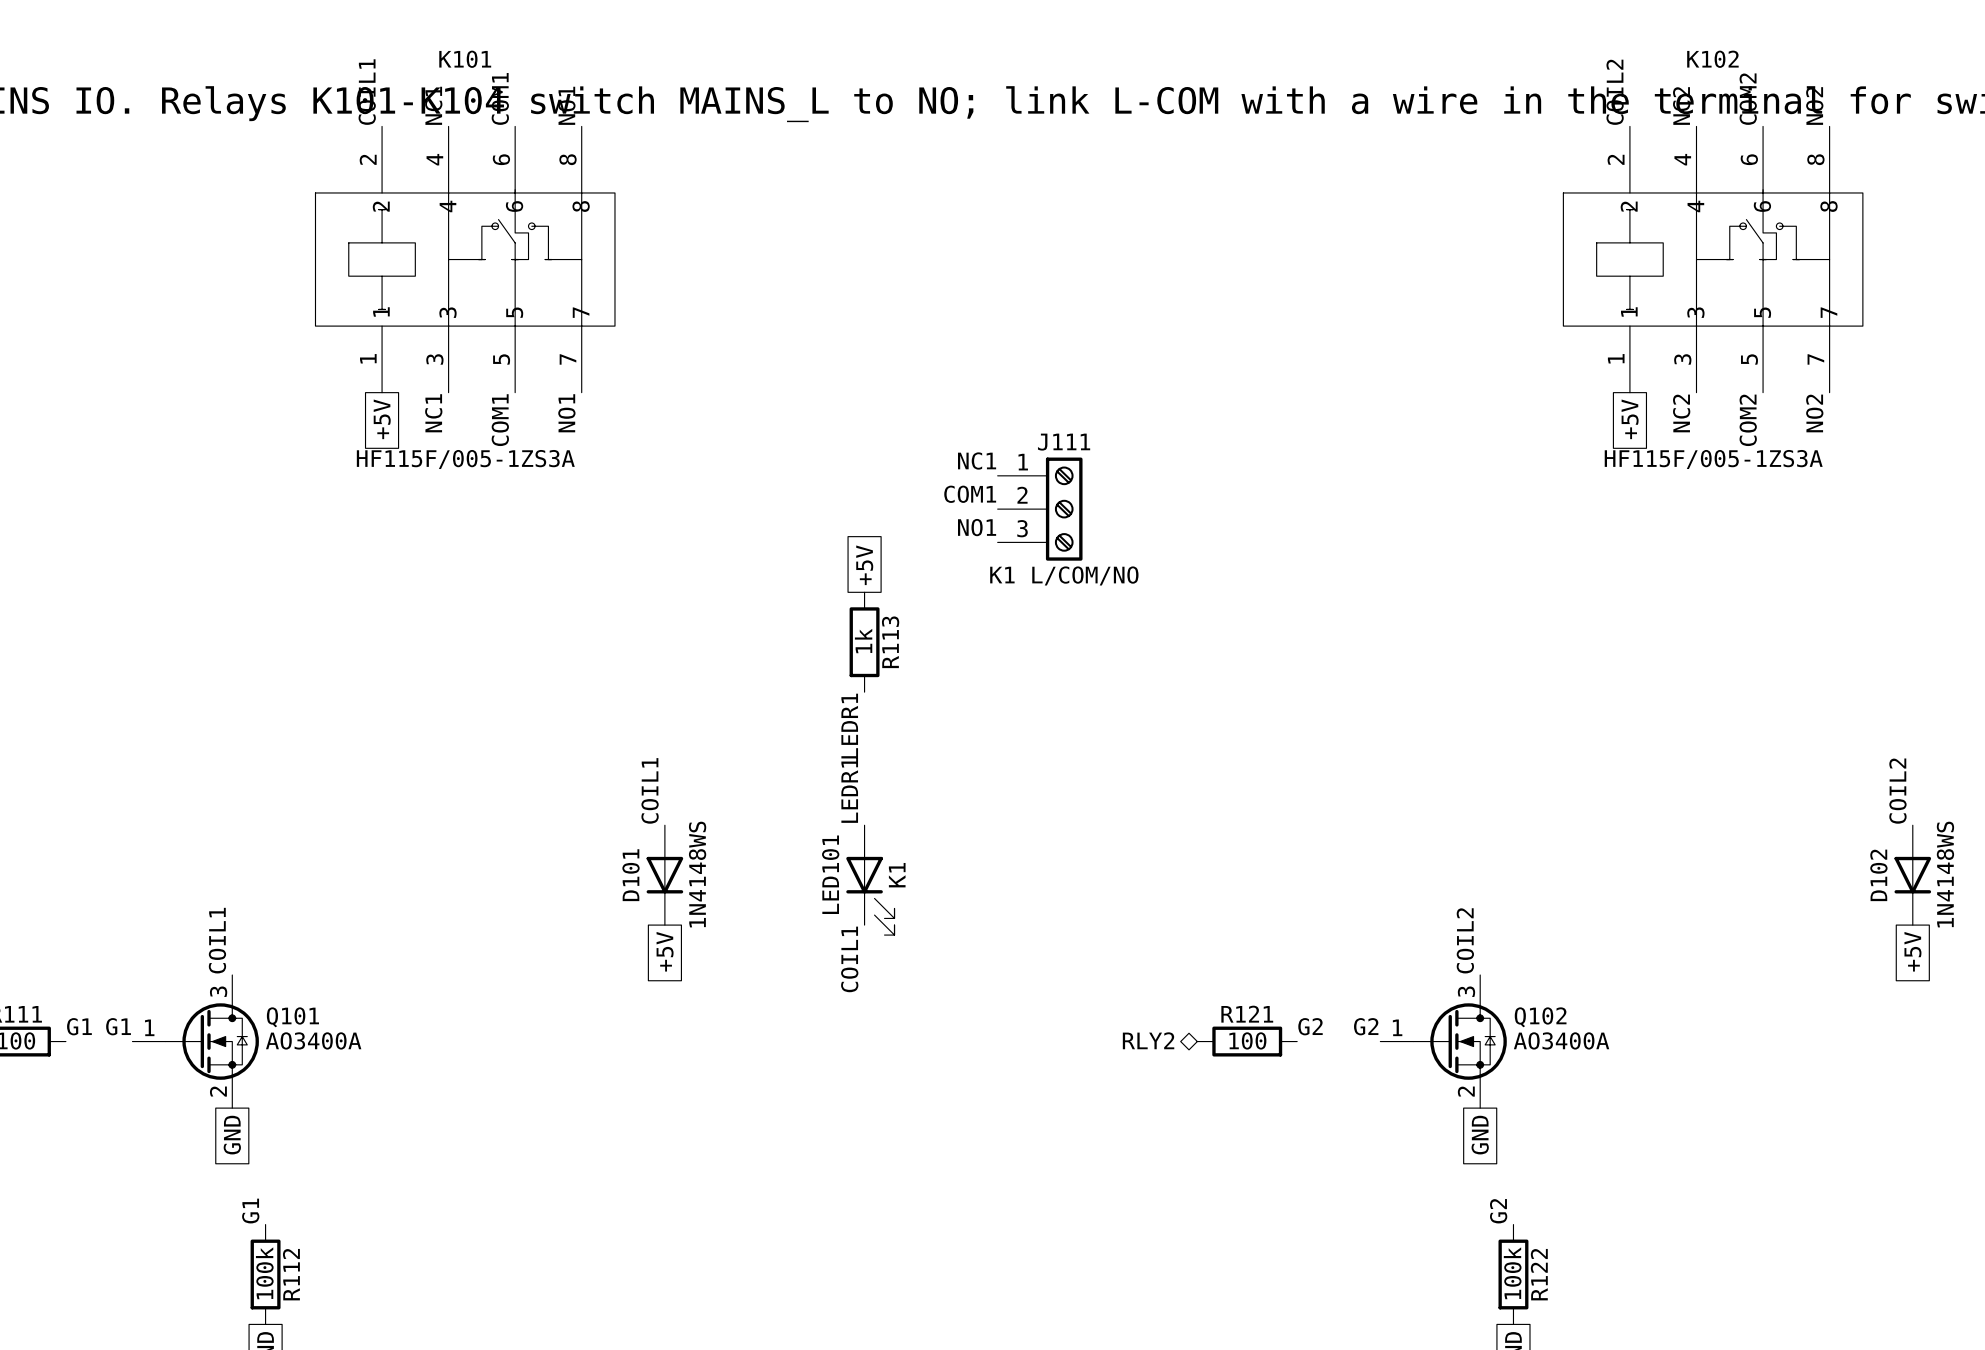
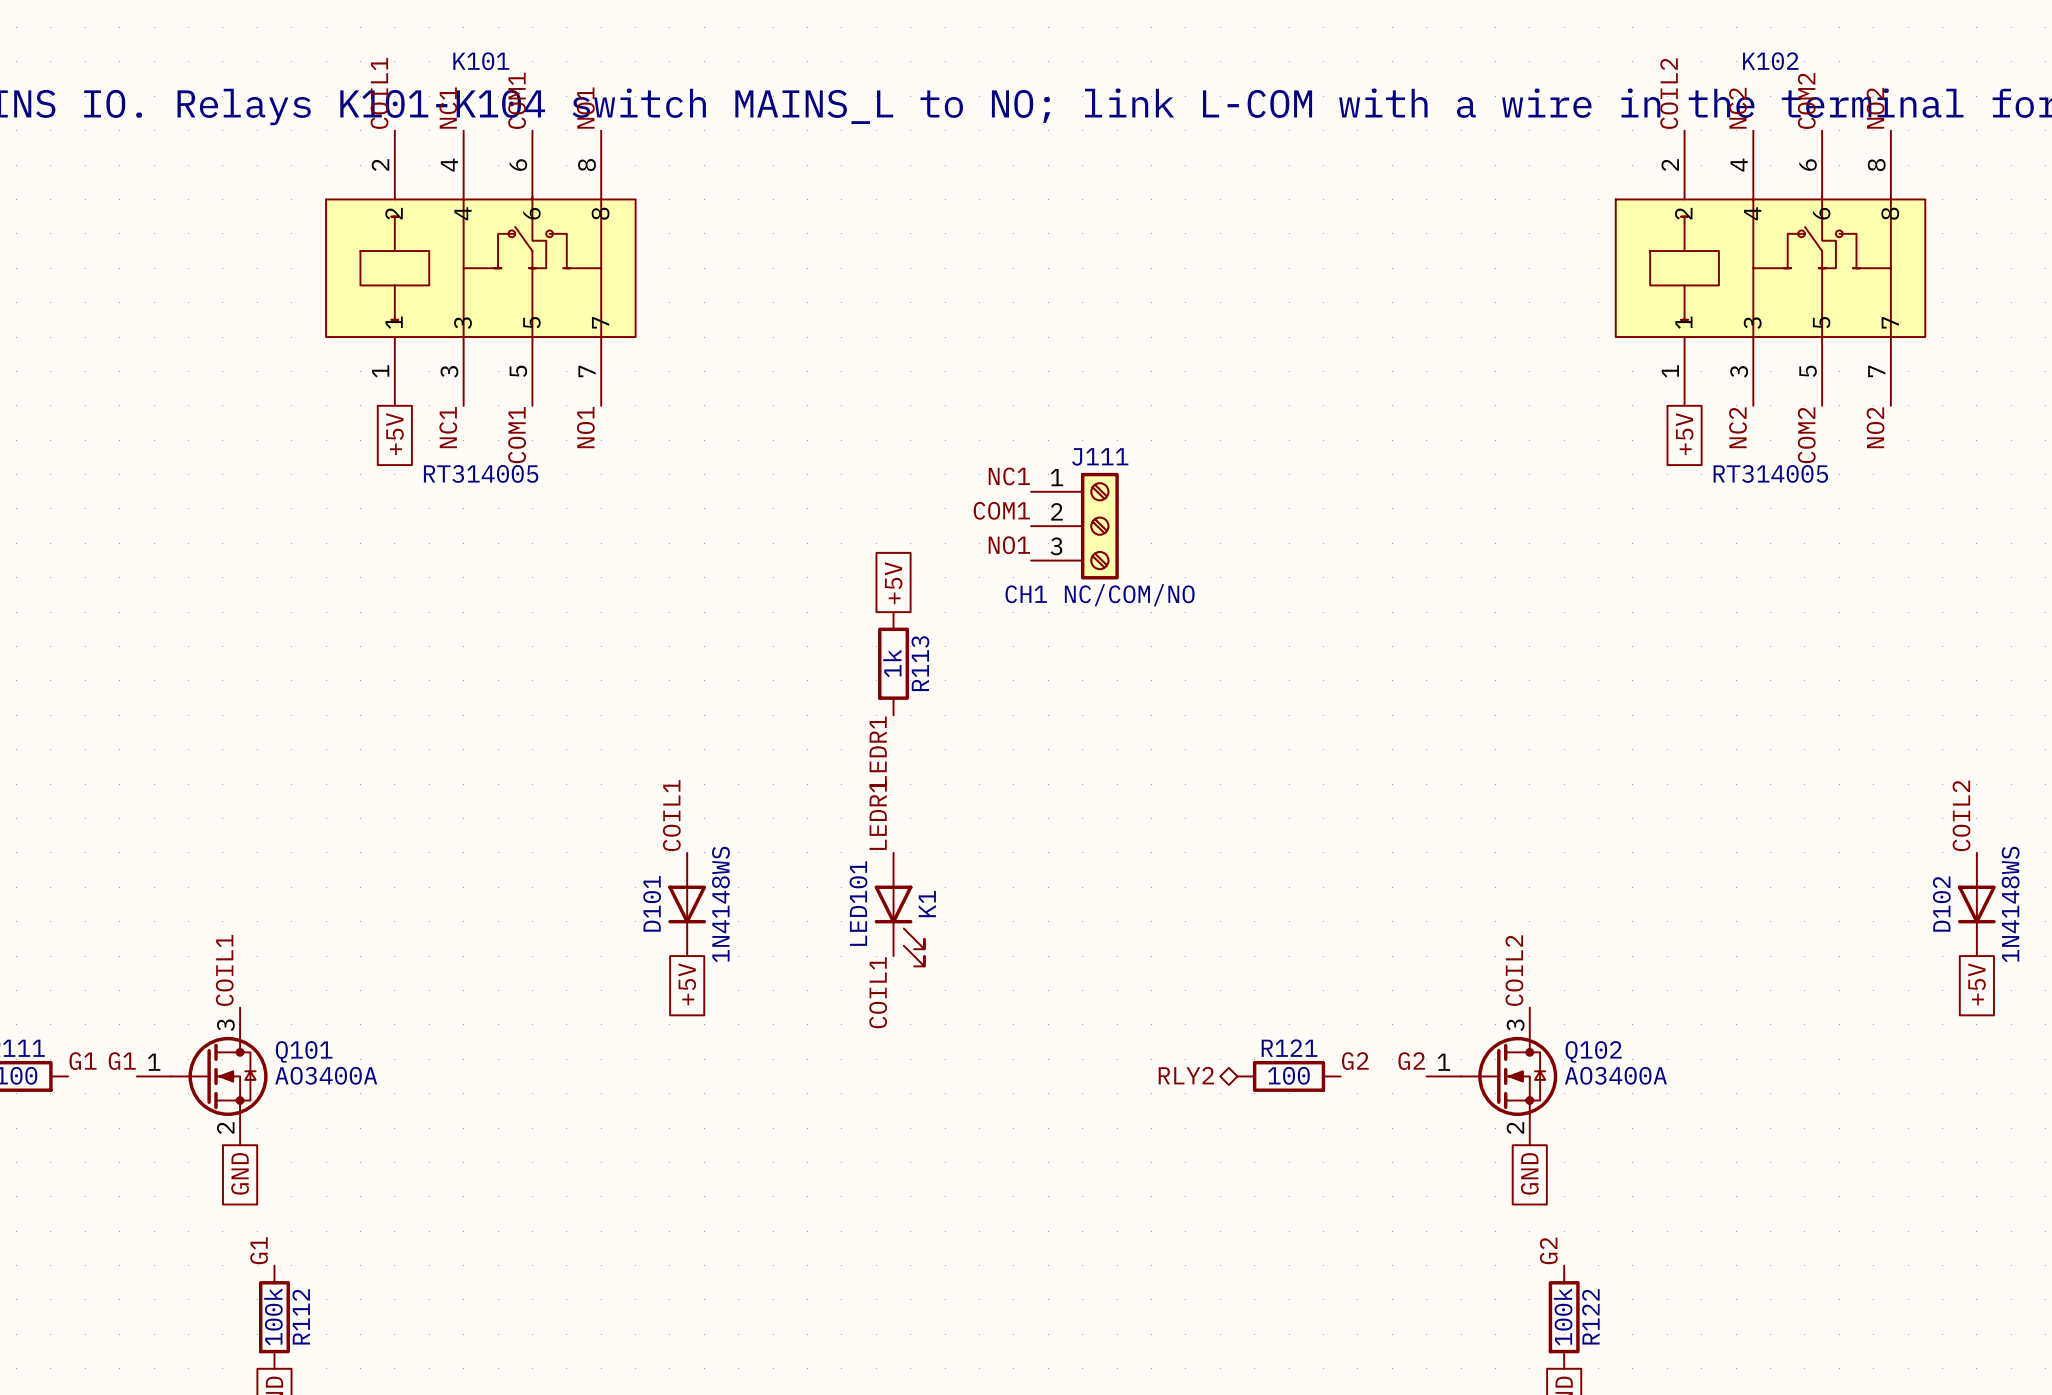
K101 value: HF115F/005-1ZS3A (465, 459) -> RT314005 (481, 473)
K102 value: HF115F/005-1ZS3A (1713, 459) -> RT314005 (1770, 473)
J111 value: K1 L/COM/NO (1064, 575) -> CH1 NC/COM/NO (1100, 595)

